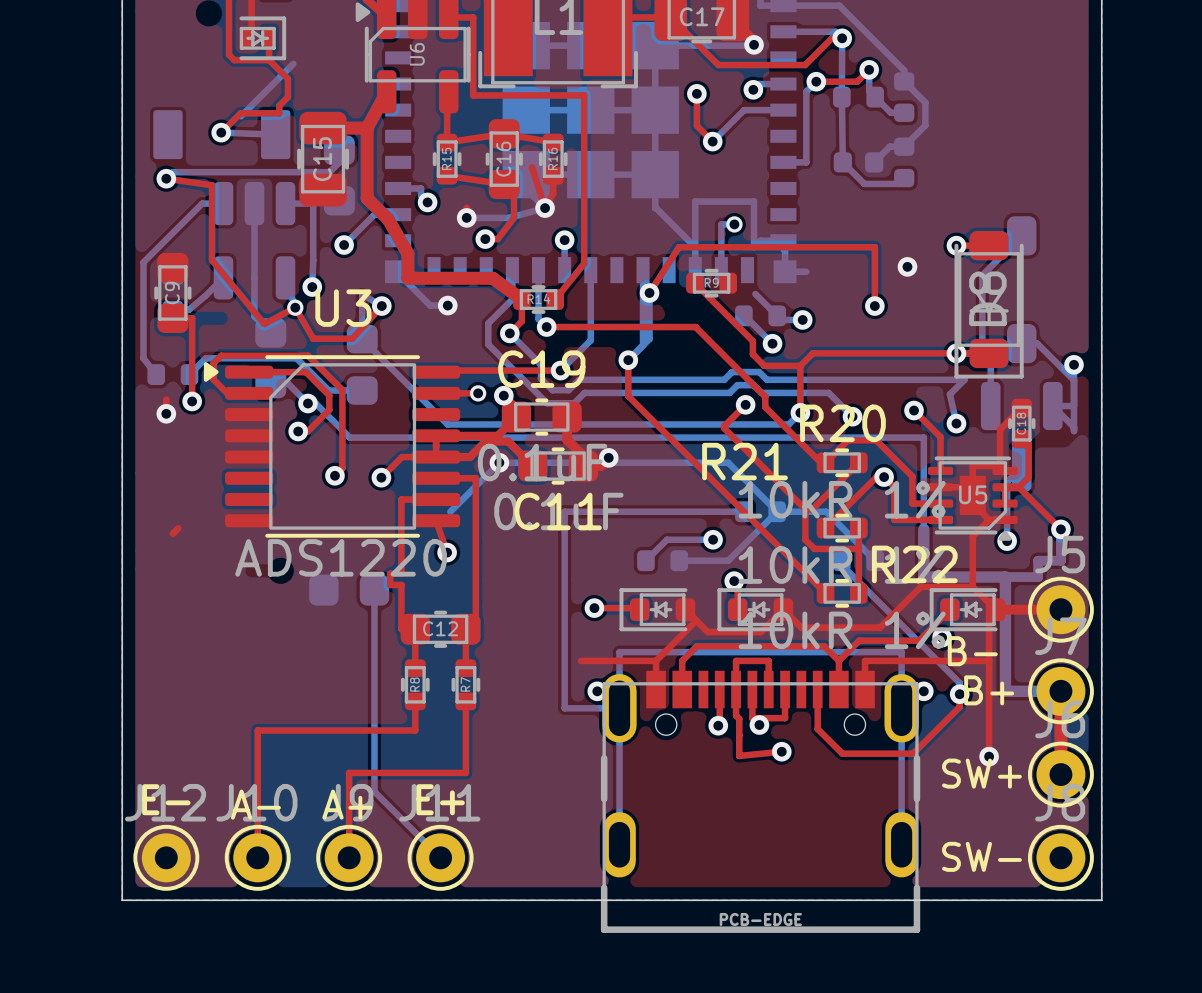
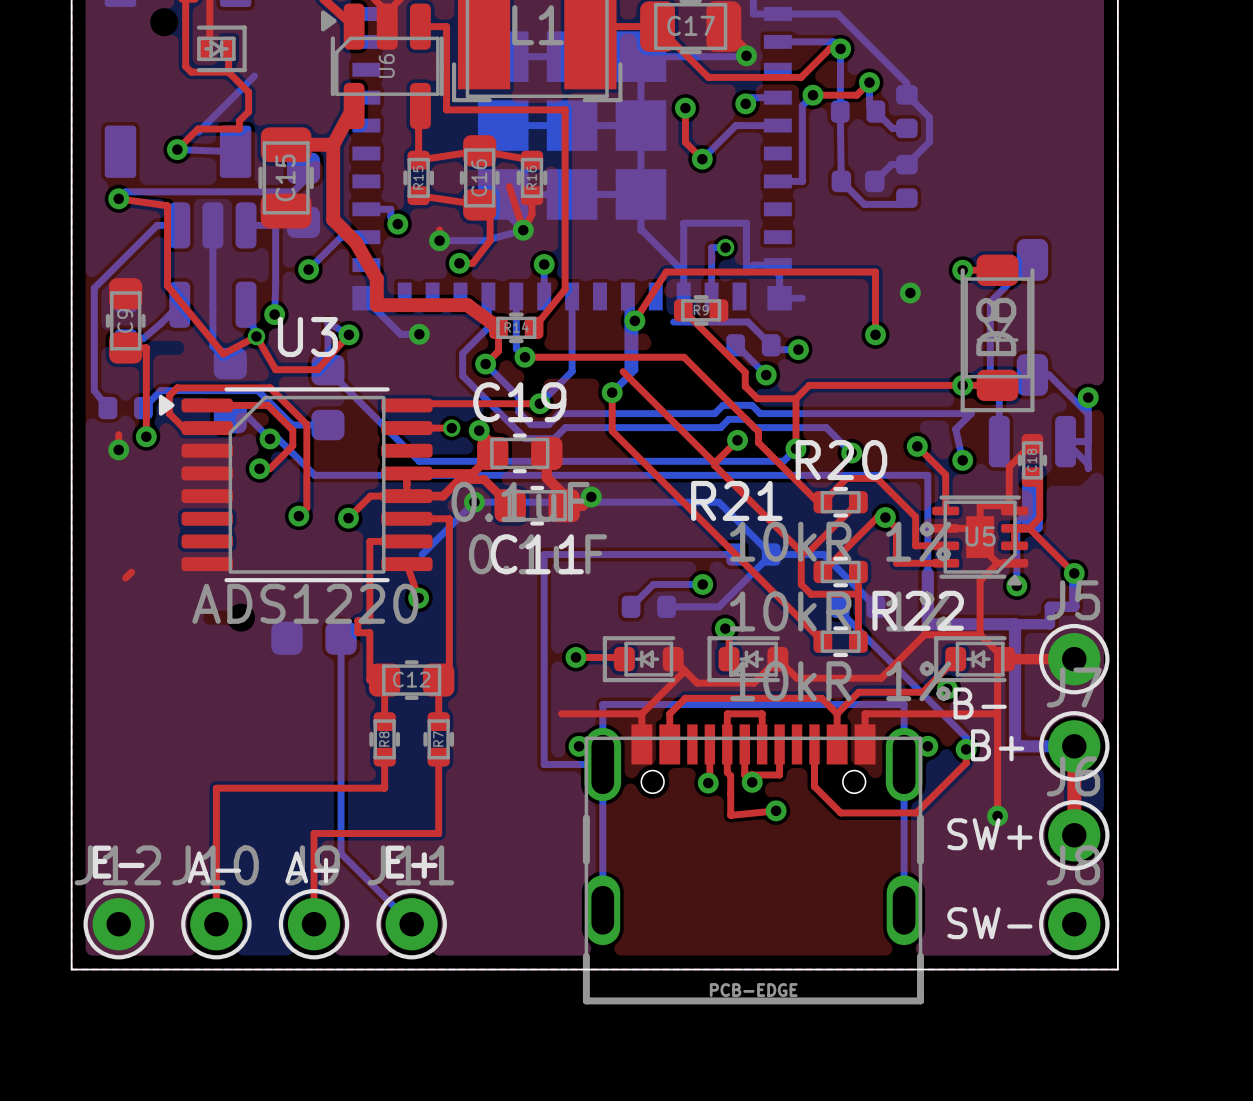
bottom track: none -> (673, 322) (747, 322)
top track: none -> (623, 371) (714, 463)

